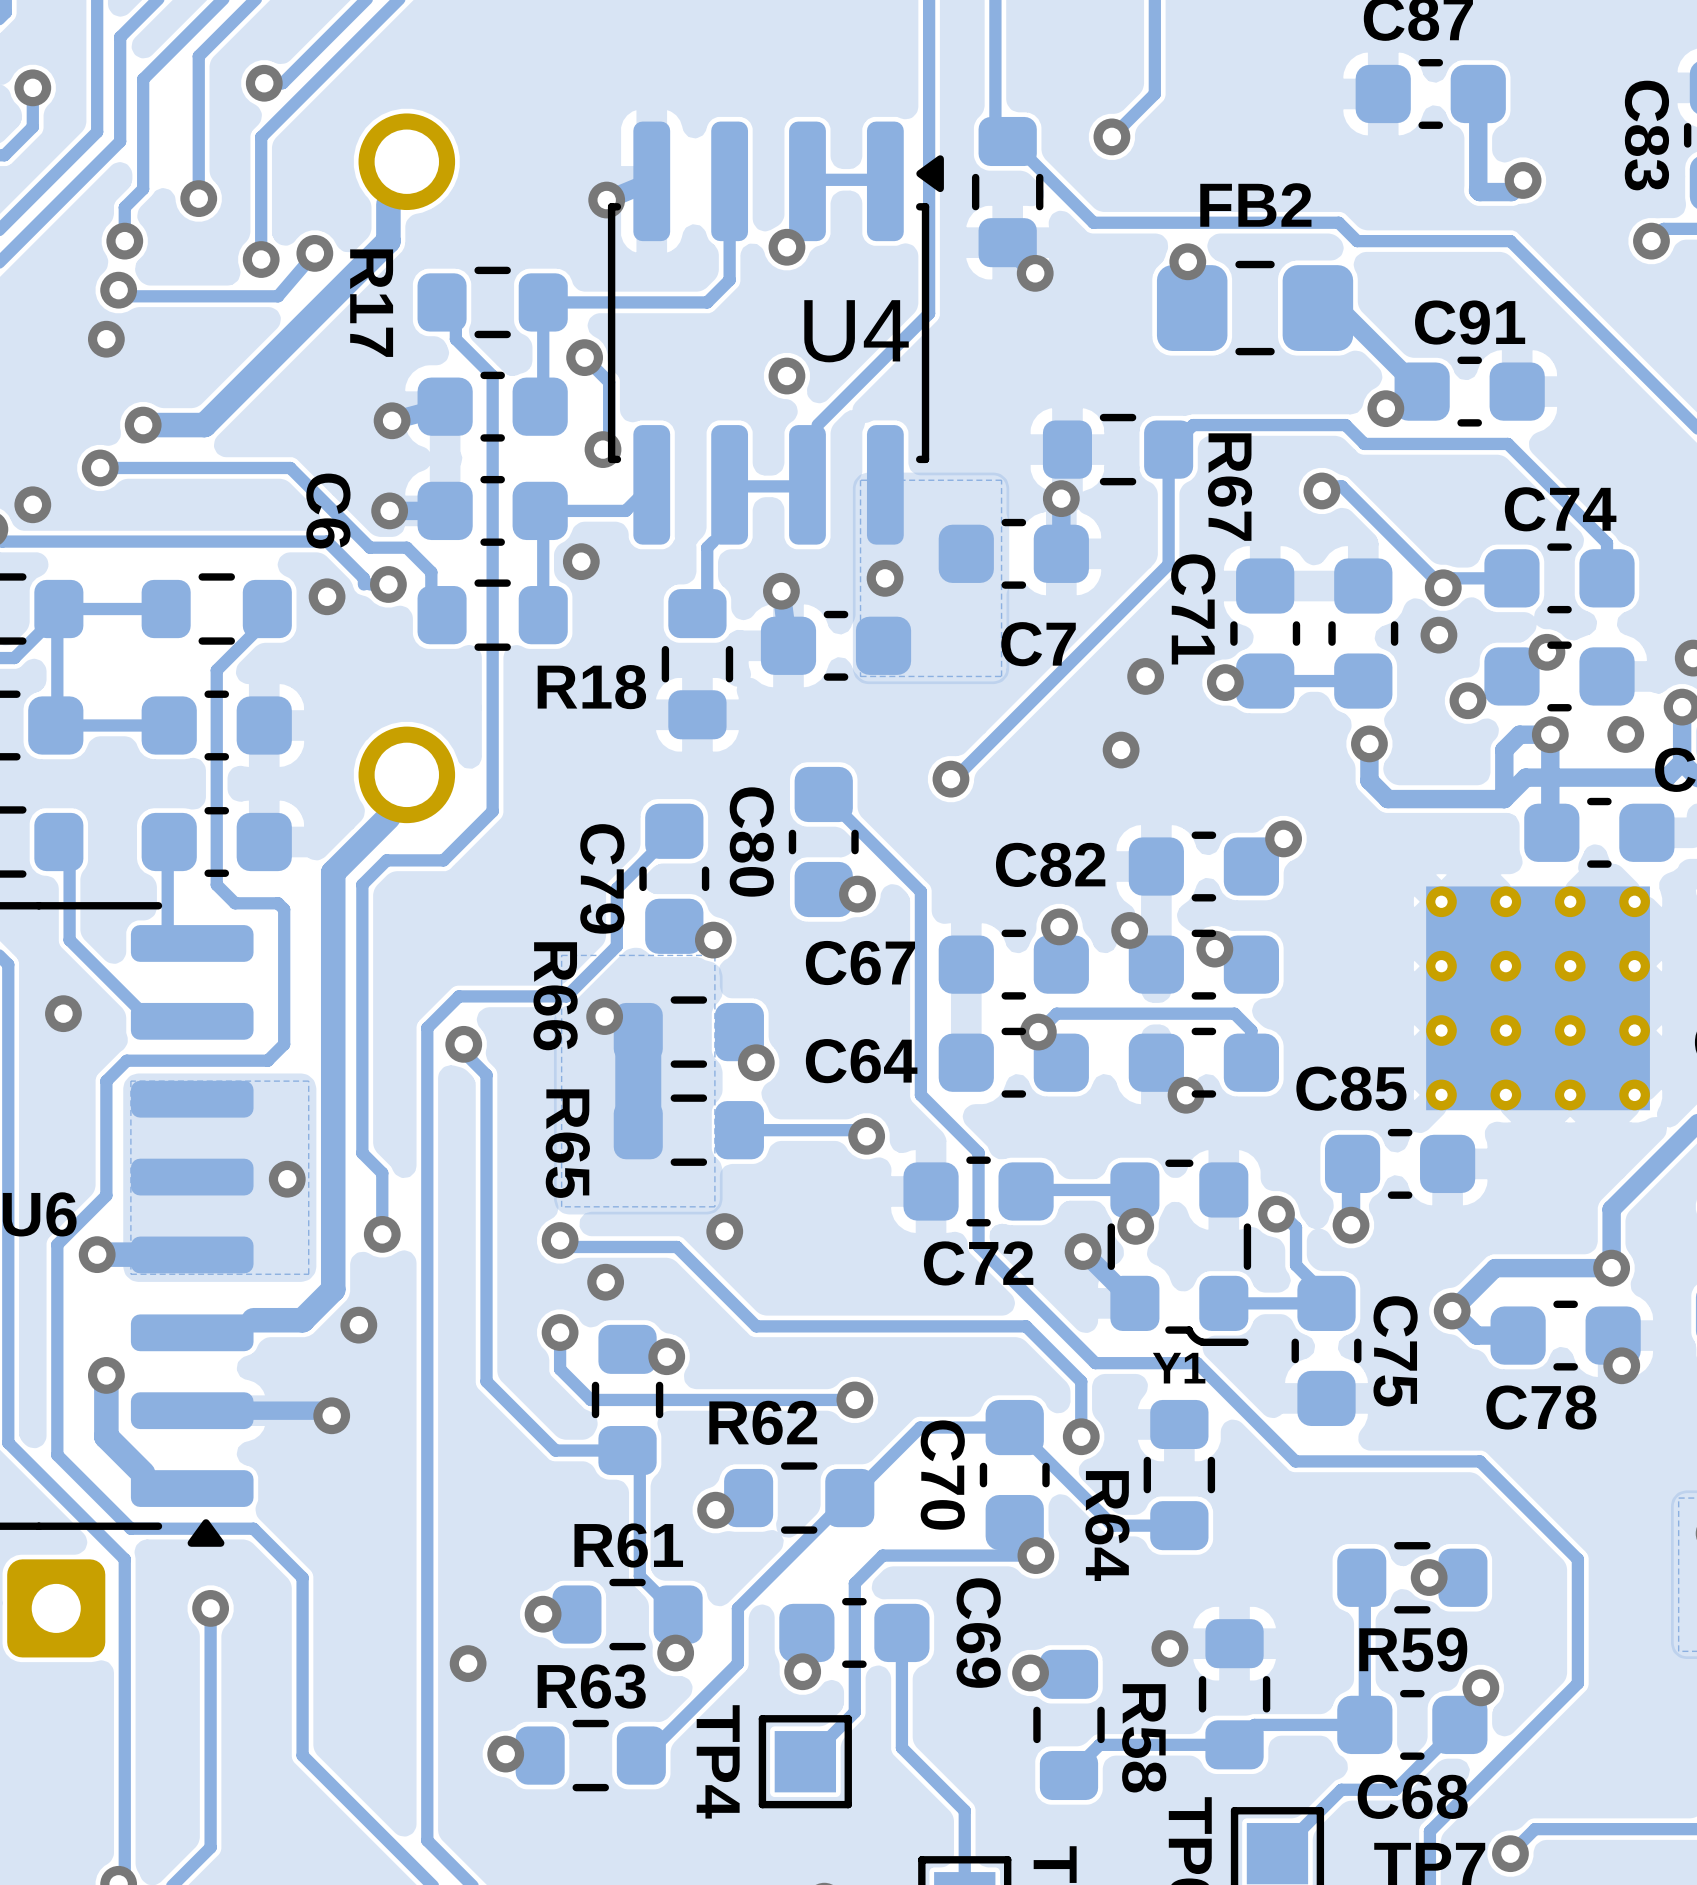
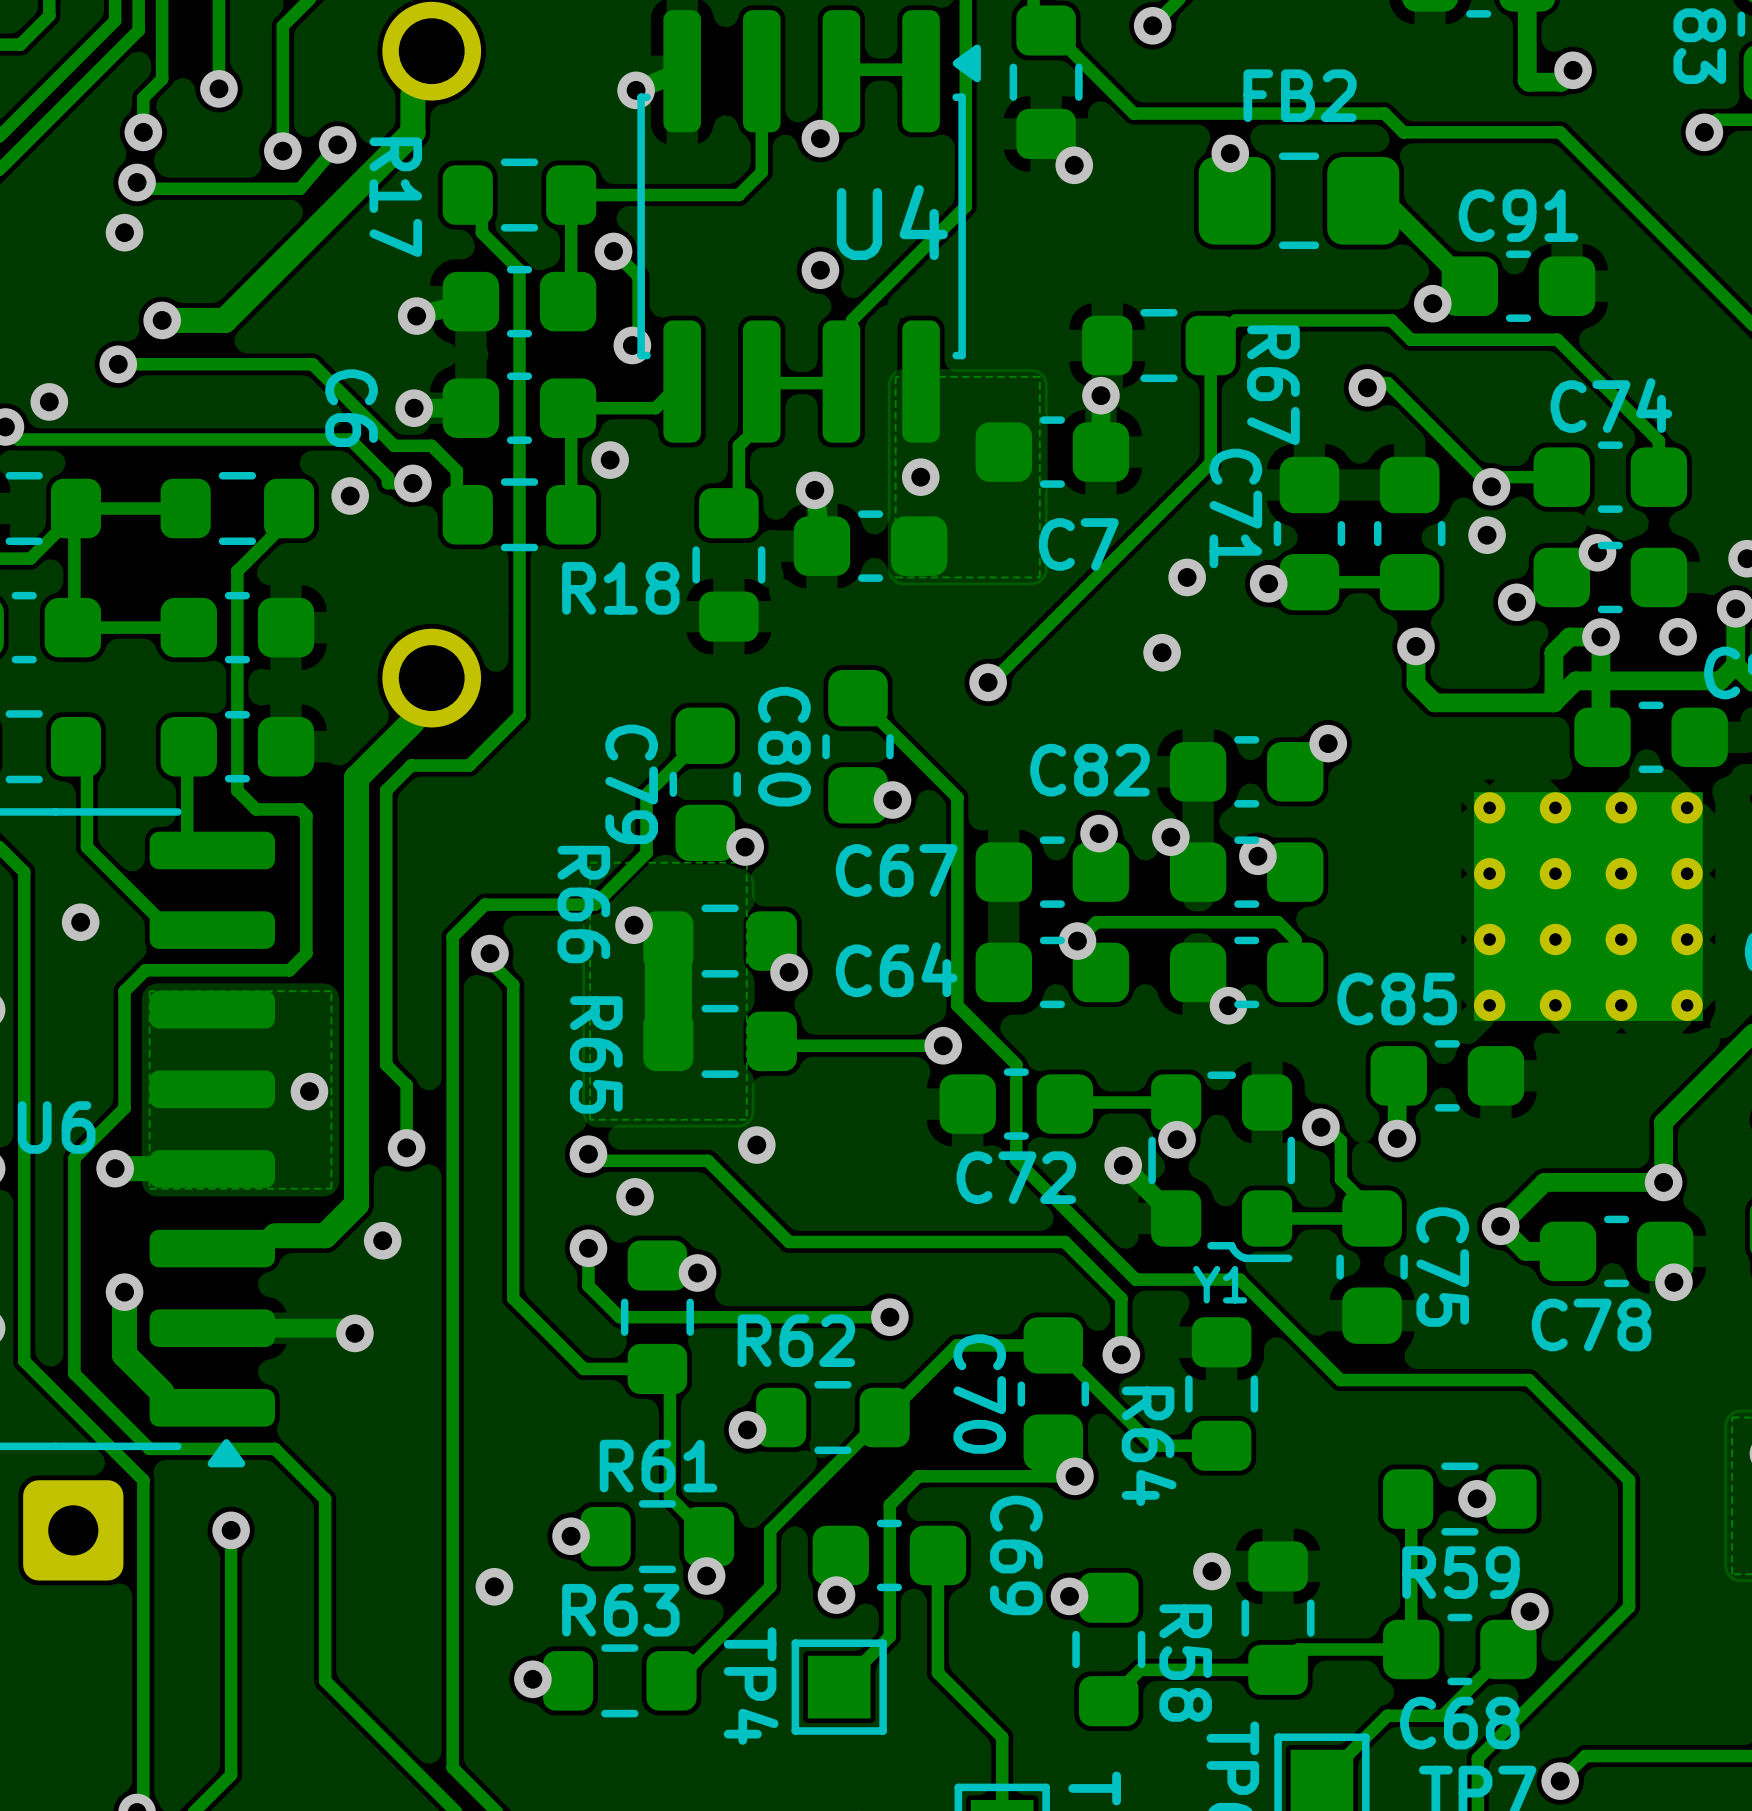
track: (739, 1130) (860, 1130) (866, 1136) -> (771, 1041) (776, 1045) (943, 1045)
via position: (866, 1136) -> (943, 1045)

